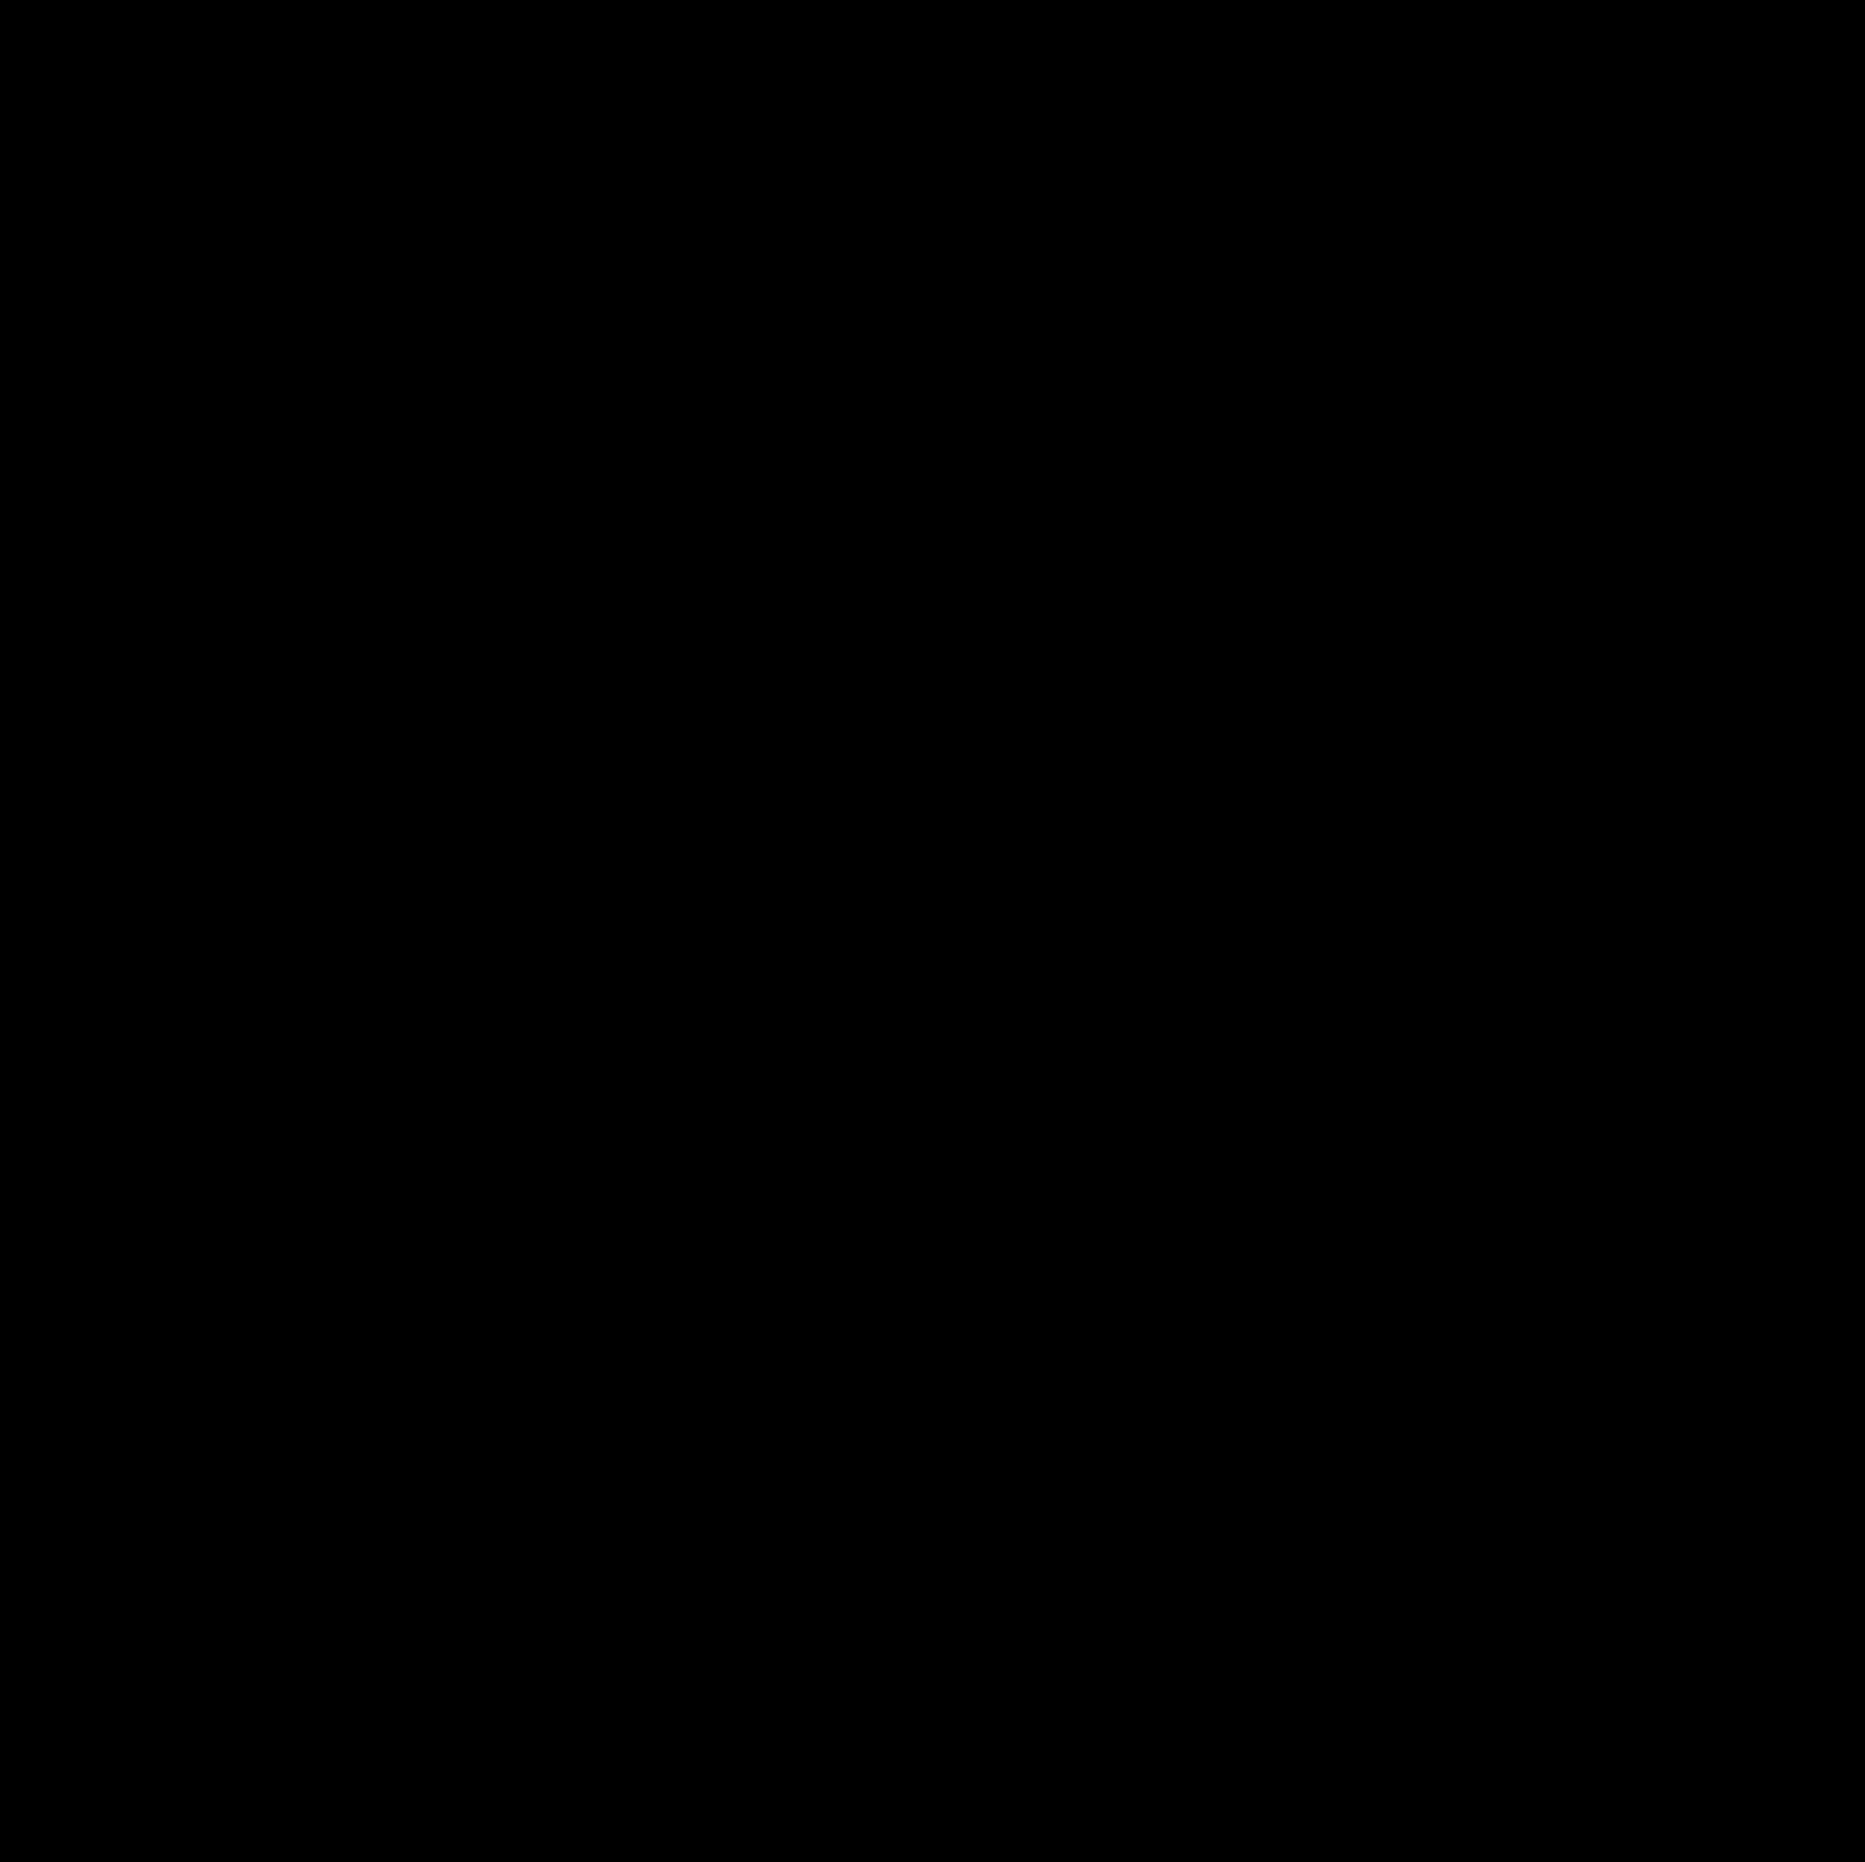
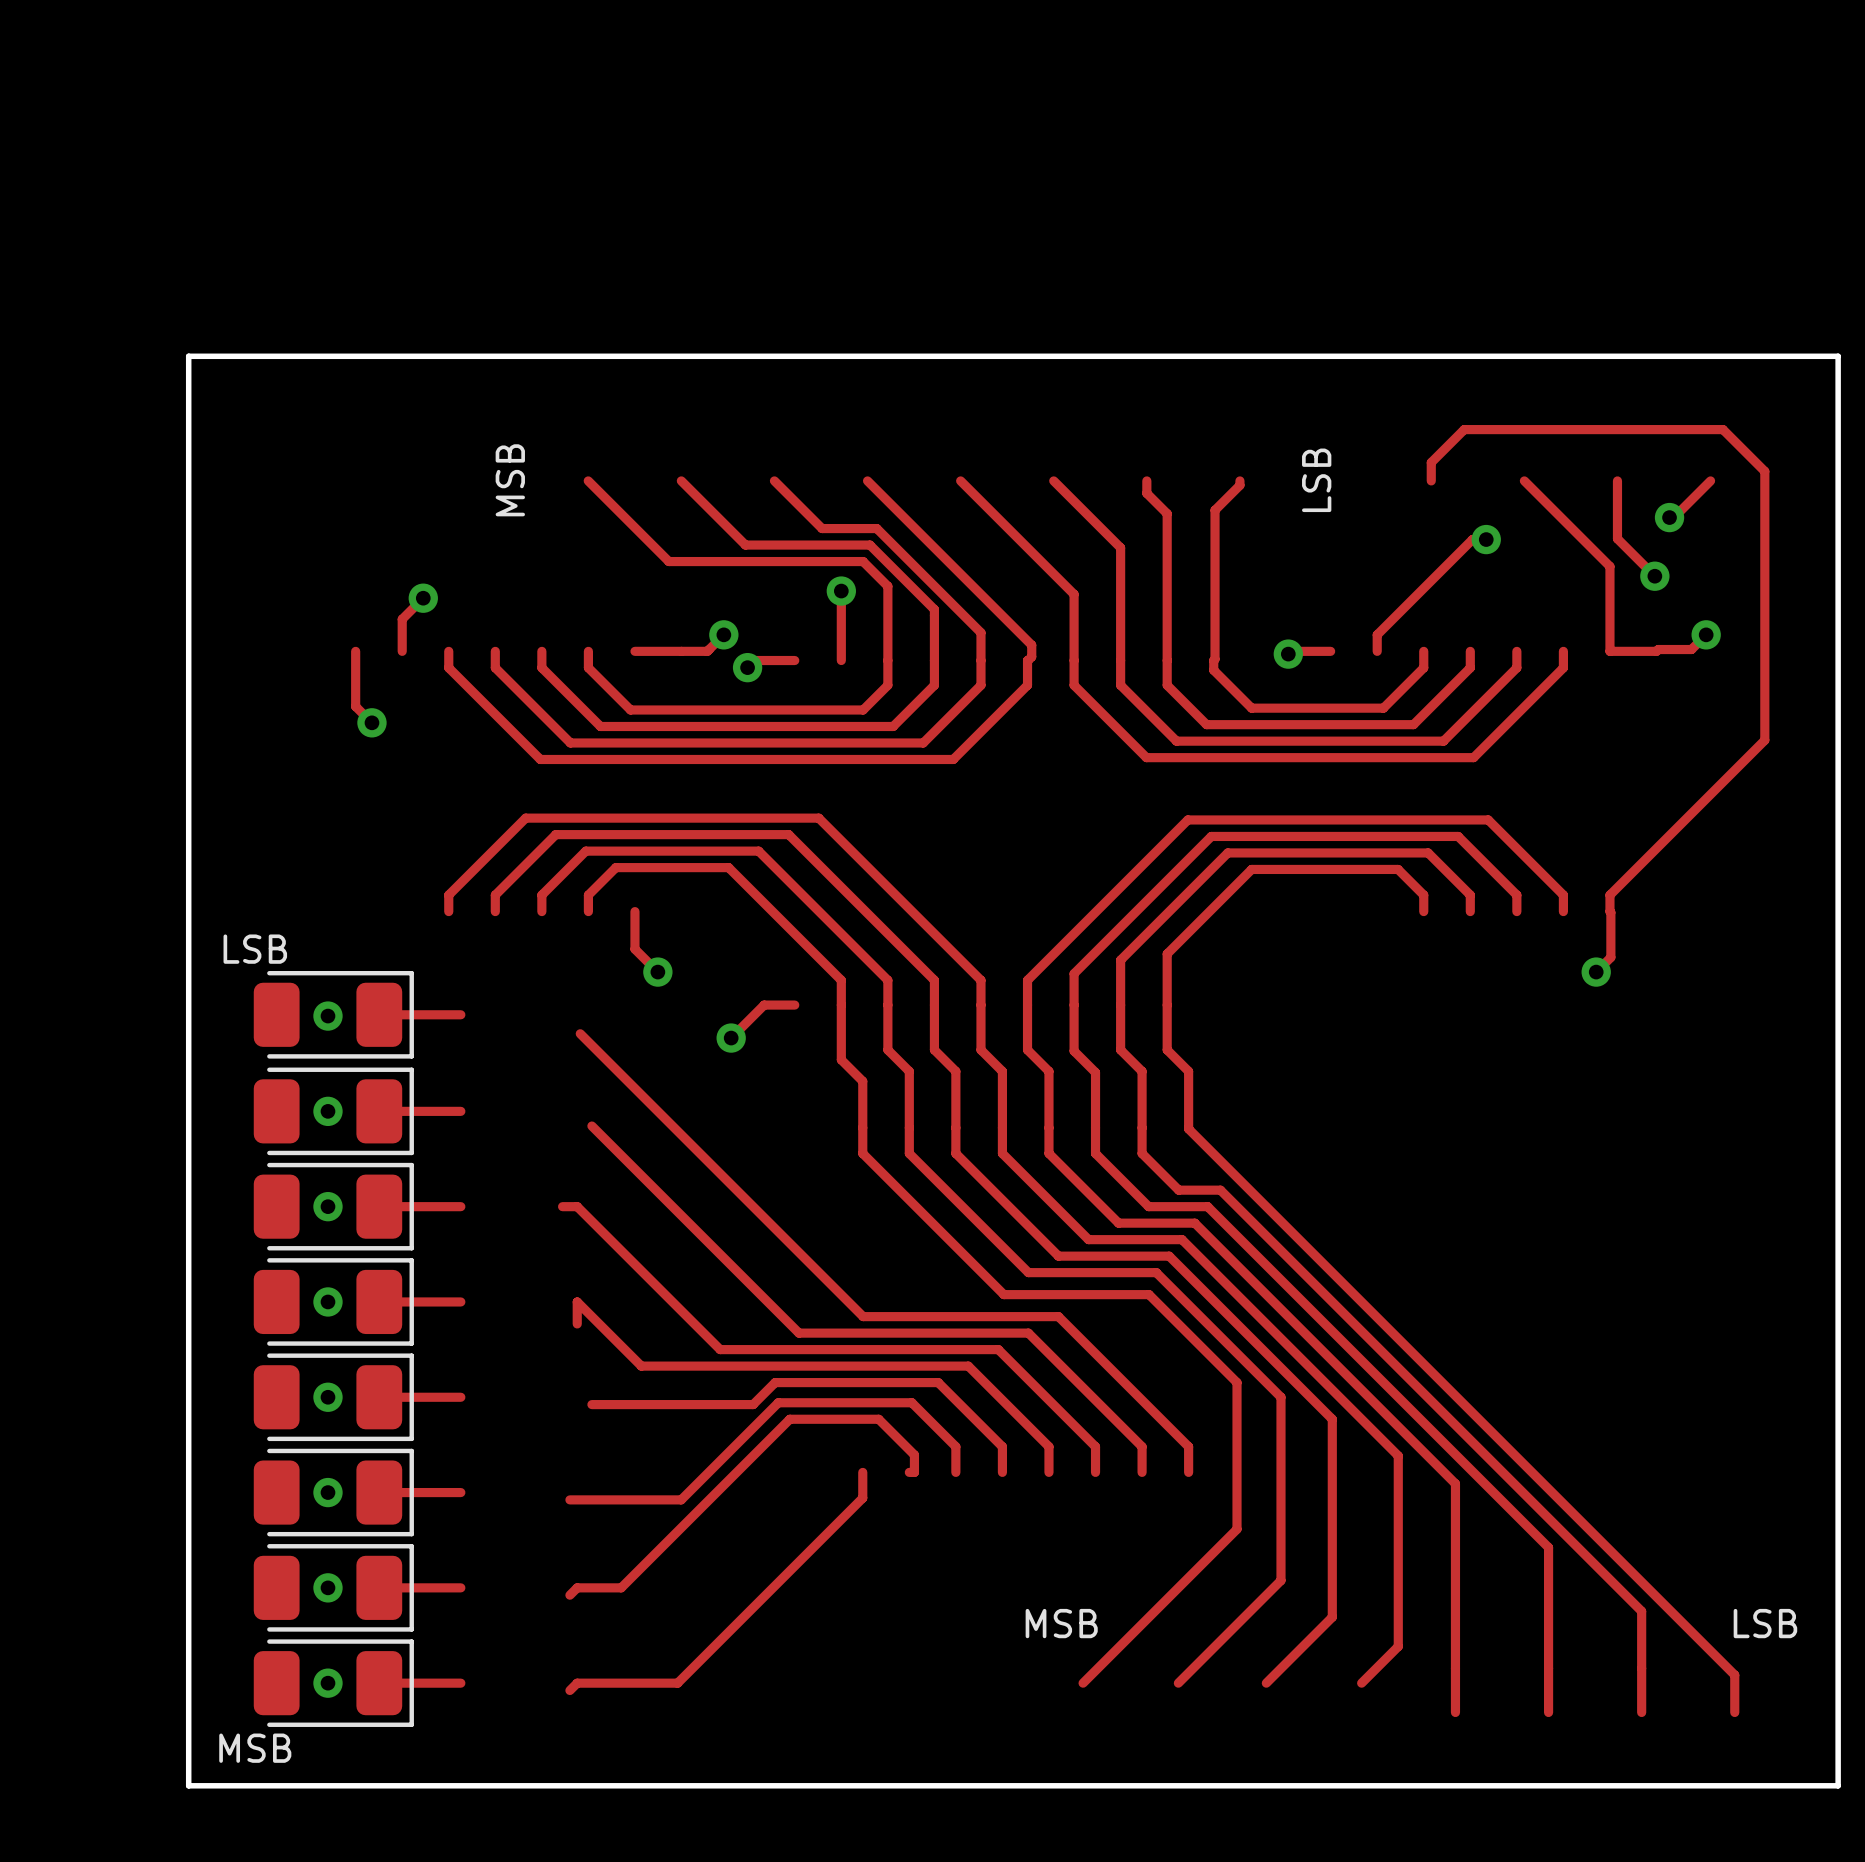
board edge: none -> (188, 356) (188, 1785) (1838, 1785) (1838, 356) (188, 356)
text: none -> MSB (510, 480)
track: none -> (588, 480) (668, 561) (863, 561) (887, 586) (887, 685) (863, 710) (630, 710) (588, 667) (588, 651)
track: none -> (681, 480) (745, 545) (869, 545) (934, 609) (934, 685) (893, 726) (600, 726) (541, 667) (541, 651)
track: none -> (774, 480) (822, 528) (876, 528) (980, 632) (980, 685) (923, 742) (570, 742) (495, 667) (495, 651)
track: none -> (867, 480) (1031, 645) (1031, 656) (1028, 660)
track: none -> (960, 480) (1074, 594) (1074, 685) (1146, 757) (1473, 757) (1563, 667) (1563, 651)
track: none -> (1053, 480) (1120, 547) (1120, 685) (1176, 741) (1443, 741) (1516, 667) (1516, 651)
track: none -> (1146, 480) (1146, 493) (1167, 513) (1167, 685) (1206, 724) (1413, 724) (1470, 667) (1470, 651)
track: none -> (1239, 480) (1239, 485) (1215, 510) (1213, 670) (1251, 708) (1383, 708) (1423, 667) (1423, 651)
text: none -> LSB (1316, 480)
track: none -> (1431, 480) (1431, 462) (1464, 429) (1723, 429) (1764, 471) (1764, 740) (1609, 895) (1610, 957) (1596, 972)
track: none -> (1524, 480) (1609, 566) (1609, 651) (1691, 649) (1706, 634)
track: none -> (1617, 480) (1617, 538) (1654, 576)
track: none -> (1710, 480) (1673, 517) (1669, 517)
via: none -> (1669, 517)
track: none -> (1486, 539) (1472, 539) (1377, 634) (1377, 651)
via: none -> (1486, 539)
via: none -> (1654, 576)
track: none -> (841, 591) (841, 660)
via: none -> (841, 591)
track: none -> (423, 598) (402, 619) (402, 651)
via: none -> (423, 598)
track: none -> (723, 634) (707, 651) (634, 651)
via: none -> (723, 634)
via: none -> (1706, 634)
track: none -> (355, 651) (355, 706) (371, 722)
track: none -> (448, 651) (448, 667) (540, 759) (953, 759) (1027, 685) (1027, 660)
track: none -> (1330, 651) (1291, 651) (1288, 654)
via: none -> (1288, 654)
track: none -> (794, 660) (754, 660) (747, 667)
via: none -> (747, 667)
via: none -> (371, 722)
track: none -> (448, 911) (448, 895) (525, 818) (818, 818) (980, 980) (980, 1049) (1002, 1071) (1002, 1153) (1088, 1239) (1182, 1239) (1398, 1455) (1398, 1646) (1361, 1683)
track: none -> (495, 911) (495, 895) (555, 834) (788, 834) (934, 980) (934, 1049) (955, 1071) (955, 1153) (1058, 1256) (1169, 1256) (1332, 1419) (1332, 1617) (1266, 1683)
track: none -> (541, 911) (541, 895) (585, 851) (758, 851) (887, 980) (887, 1049) (909, 1071) (909, 1153) (1028, 1272) (1156, 1272) (1280, 1397) (1280, 1580) (1178, 1683)
track: none -> (588, 911) (588, 895) (615, 867) (728, 867) (841, 980) (841, 1059) (862, 1081) (862, 1153) (1003, 1294) (1149, 1294) (1237, 1382) (1237, 1529) (1083, 1683)
track: none -> (634, 911) (634, 949) (657, 972)
track: none -> (1423, 911) (1423, 895) (1398, 869) (1251, 869) (1167, 953) (1167, 1049) (1188, 1071) (1188, 1128) (1734, 1675) (1734, 1712)
track: none -> (1470, 911) (1470, 895) (1428, 852) (1227, 852) (1120, 960) (1120, 1049) (1142, 1071) (1142, 1153) (1178, 1190) (1220, 1190) (1641, 1611) (1641, 1712)
track: none -> (1516, 911) (1516, 895) (1458, 836) (1211, 836) (1074, 973) (1074, 1051) (1095, 1072) (1095, 1153) (1148, 1206) (1207, 1206) (1548, 1547) (1548, 1712)
track: none -> (1563, 911) (1563, 895) (1488, 819) (1187, 819) (1027, 980) (1027, 1049) (1048, 1071) (1048, 1153) (1118, 1223) (1194, 1223) (1455, 1483) (1455, 1712)
text: none -> LSB (255, 949)
via: none -> (657, 972)
via: none -> (1596, 972)
track: none -> (794, 1005) (764, 1005) (731, 1038)
part: none -> (333, 1014)
track: none -> (379, 1014) (460, 1014)
via: none -> (327, 1016)
track: none -> (580, 1033) (863, 1316) (1058, 1316) (1188, 1446) (1188, 1472)
via: none -> (731, 1038)
via: none -> (327, 1111)
part: none -> (333, 1111)
track: none -> (379, 1111) (460, 1111)
track: none -> (591, 1126) (798, 1333) (1028, 1333) (1142, 1446) (1142, 1472)
via: none -> (327, 1206)
part: none -> (333, 1206)
track: none -> (379, 1206) (460, 1206)
track: none -> (562, 1206) (577, 1206) (720, 1349) (998, 1349) (1095, 1446) (1095, 1472)
via: none -> (327, 1301)
part: none -> (333, 1301)
track: none -> (379, 1301) (460, 1301)
track: none -> (577, 1323) (577, 1301) (641, 1366) (968, 1366) (1048, 1446) (1048, 1472)
via: none -> (327, 1397)
part: none -> (333, 1397)
track: none -> (379, 1397) (460, 1397)
track: none -> (591, 1404) (753, 1404) (775, 1382) (938, 1382) (1002, 1446) (1002, 1472)
track: none -> (862, 1472) (862, 1498) (677, 1683) (577, 1683) (569, 1690)
track: none -> (909, 1472) (914, 1472) (914, 1454) (878, 1419) (789, 1419) (621, 1587) (577, 1587) (569, 1595)
track: none -> (955, 1472) (955, 1446) (911, 1402) (778, 1402) (681, 1499) (569, 1499)
via: none -> (327, 1492)
part: none -> (333, 1492)
track: none -> (379, 1492) (460, 1492)
via: none -> (327, 1587)
part: none -> (333, 1587)
track: none -> (379, 1587) (460, 1587)
text: none -> MSB (1061, 1623)
text: none -> LSB (1765, 1623)
via: none -> (327, 1683)
part: none -> (333, 1683)
track: none -> (379, 1683) (460, 1683)
text: none -> MSB (255, 1748)

